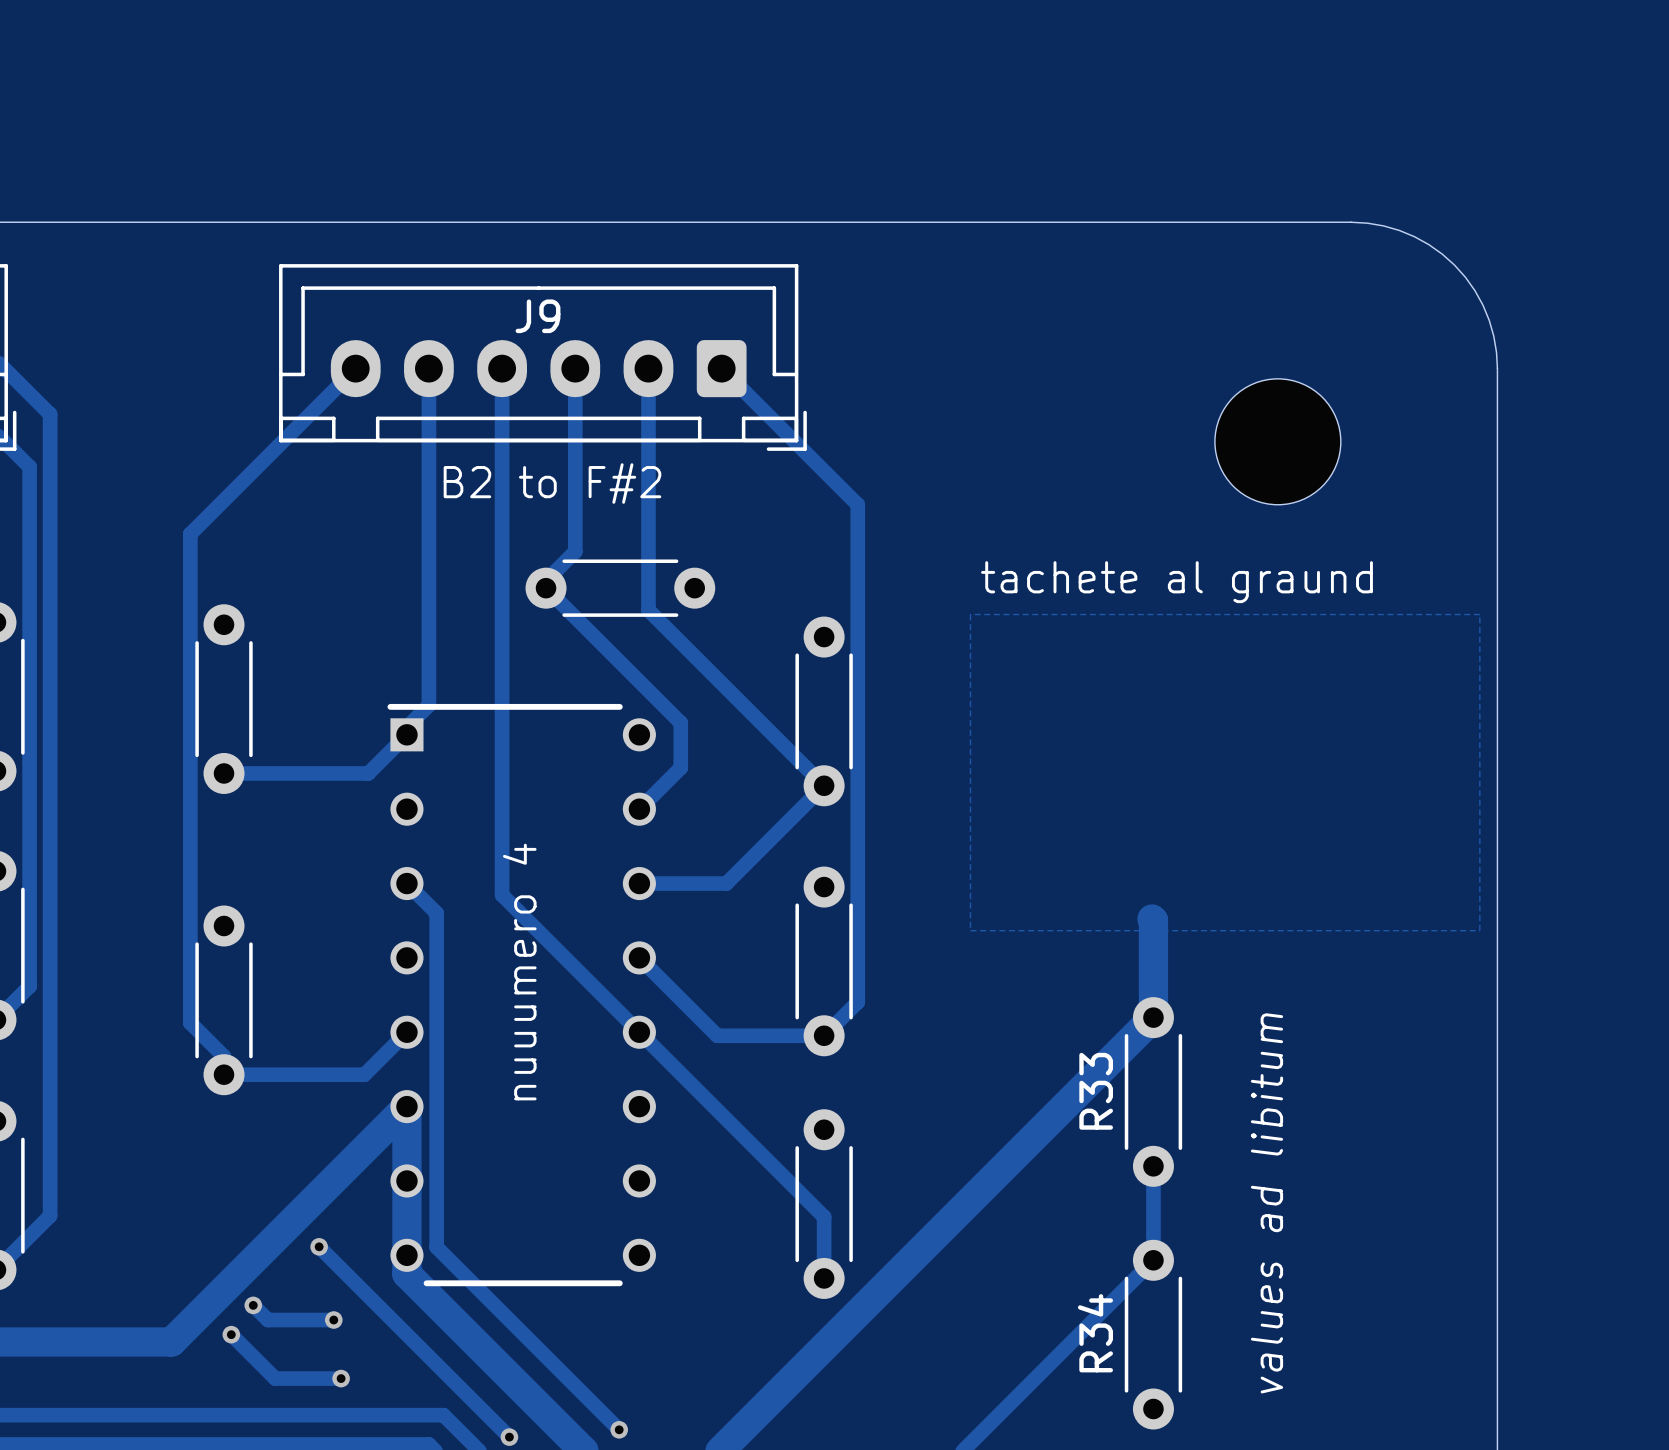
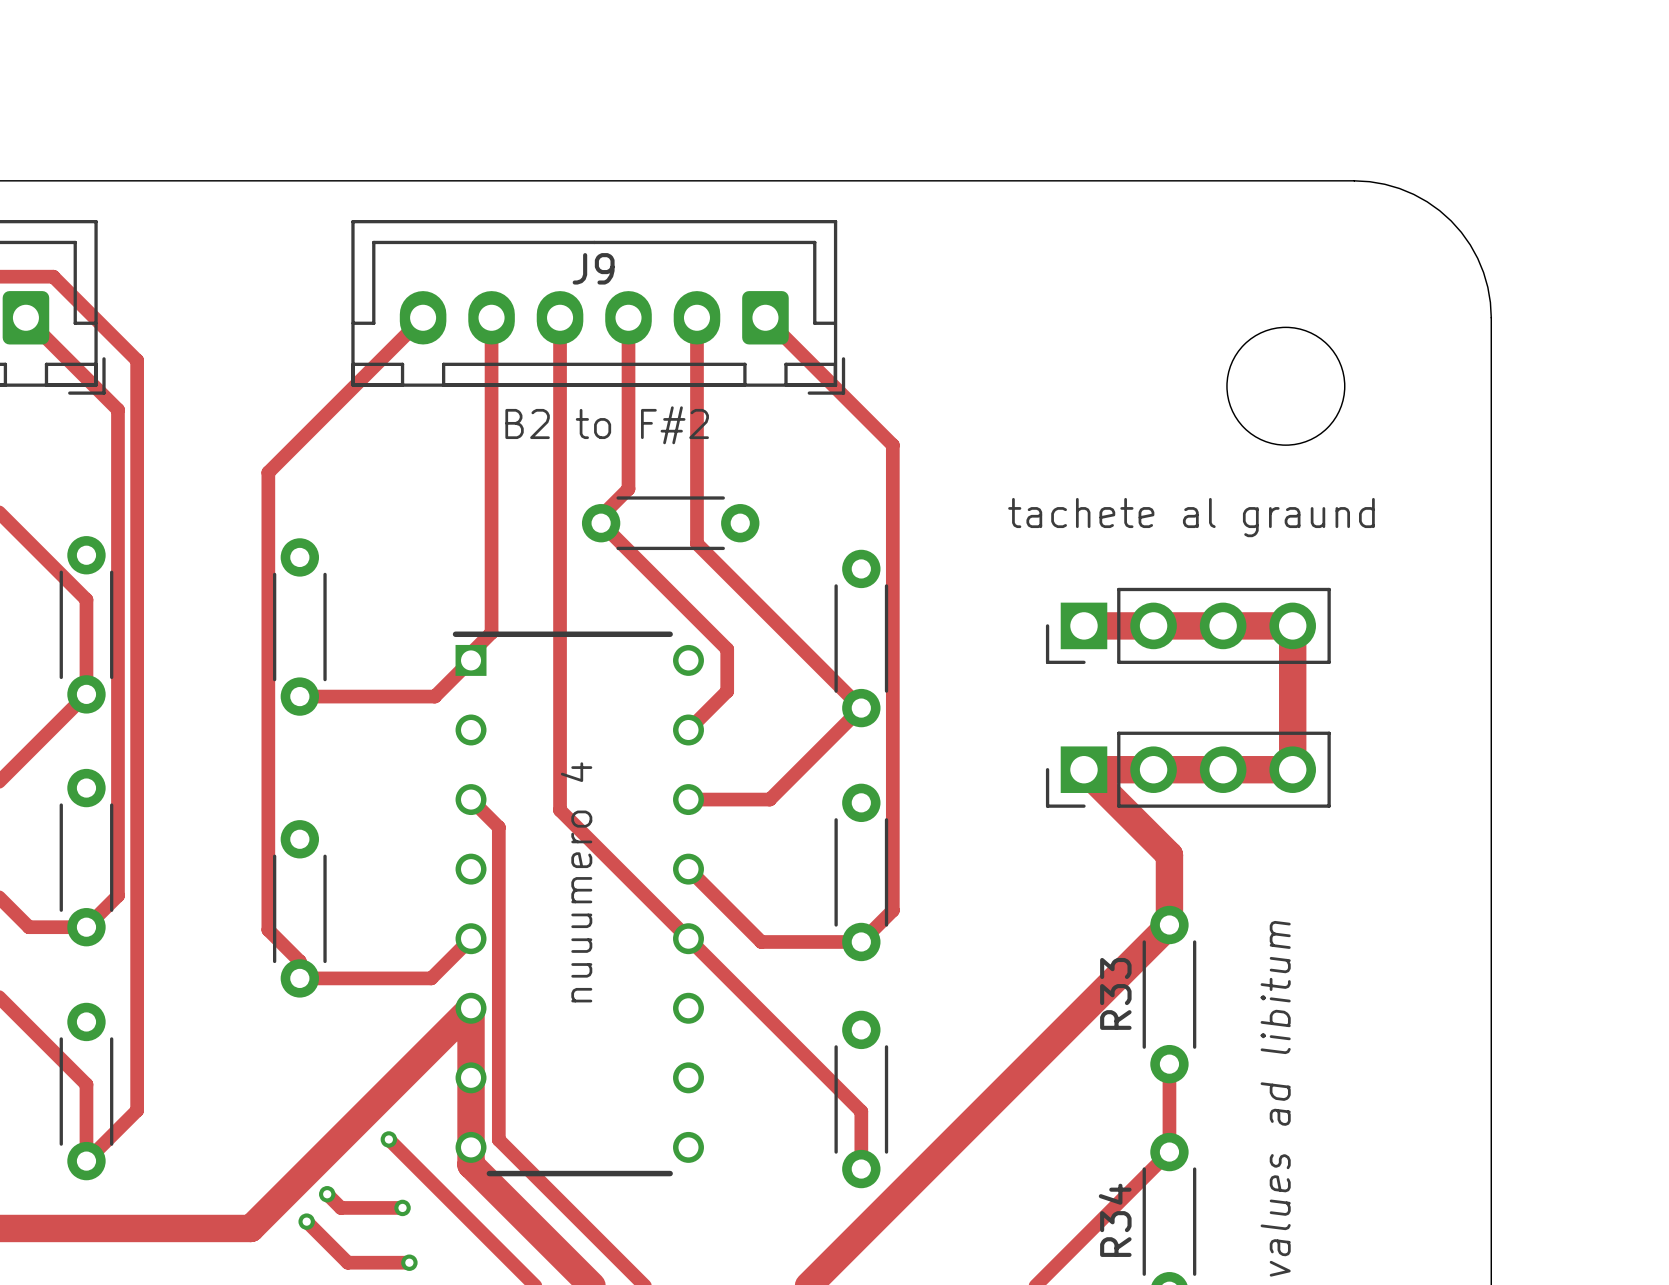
zone outline: (970, 614) (1479, 614) (1479, 930) (970, 930) (970, 614) -> none
part: none -> (1188, 625)
part: none -> (1188, 769)
track: (1151, 918) (1153, 942) -> (1084, 625) (1292, 625) (1292, 769) (1084, 769) (1169, 855)

